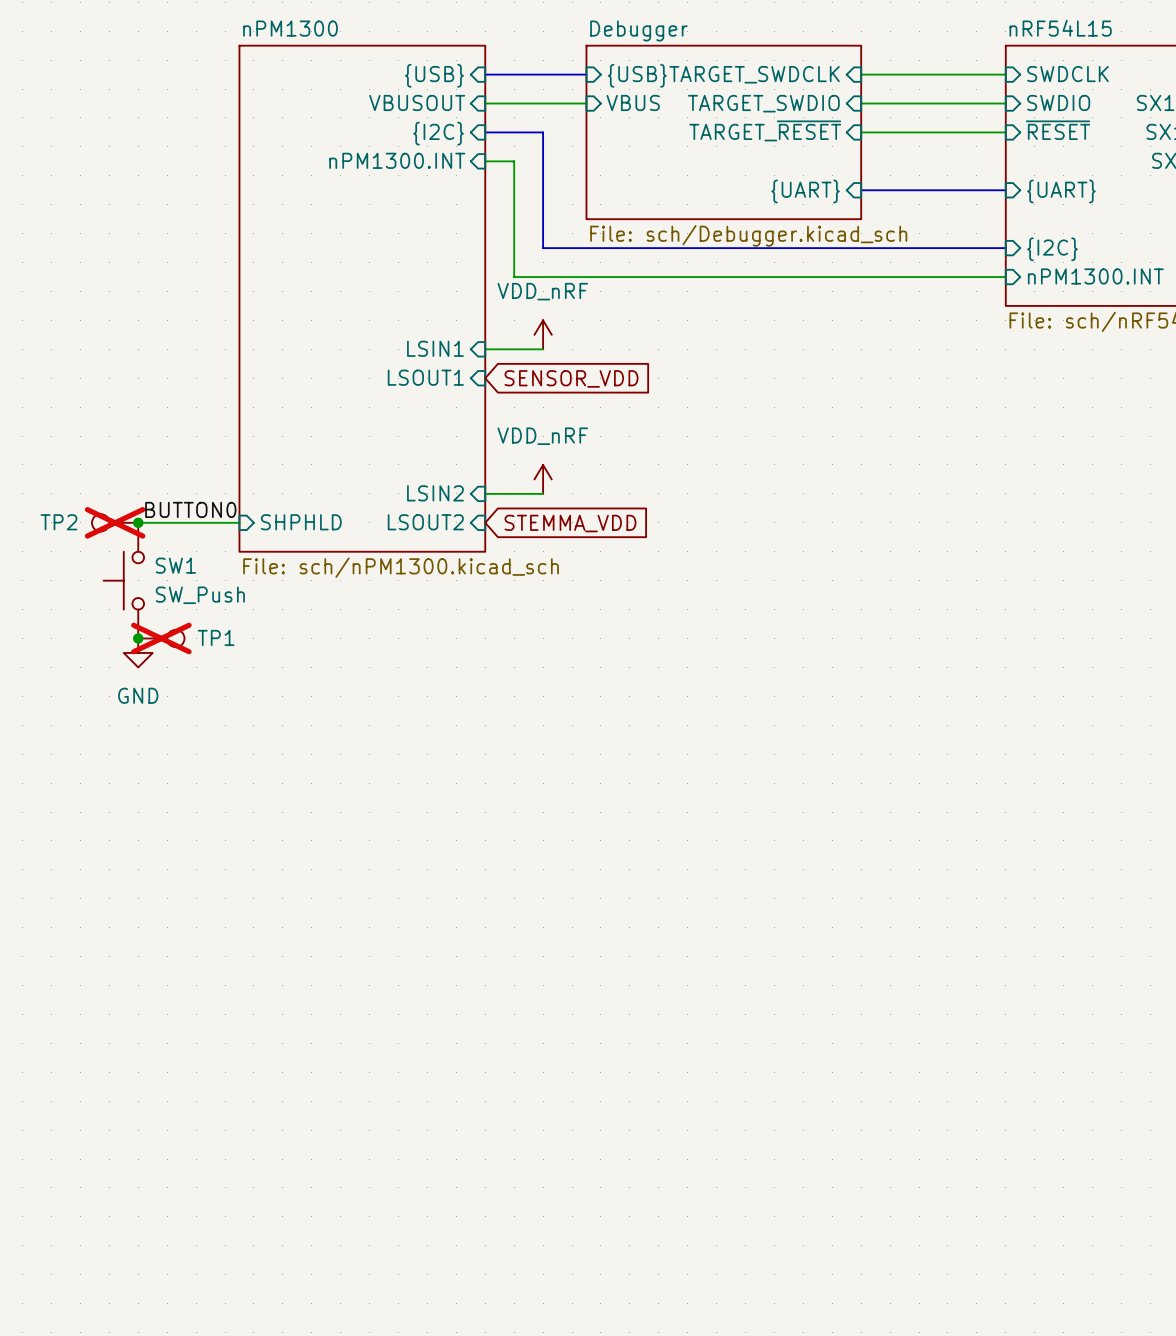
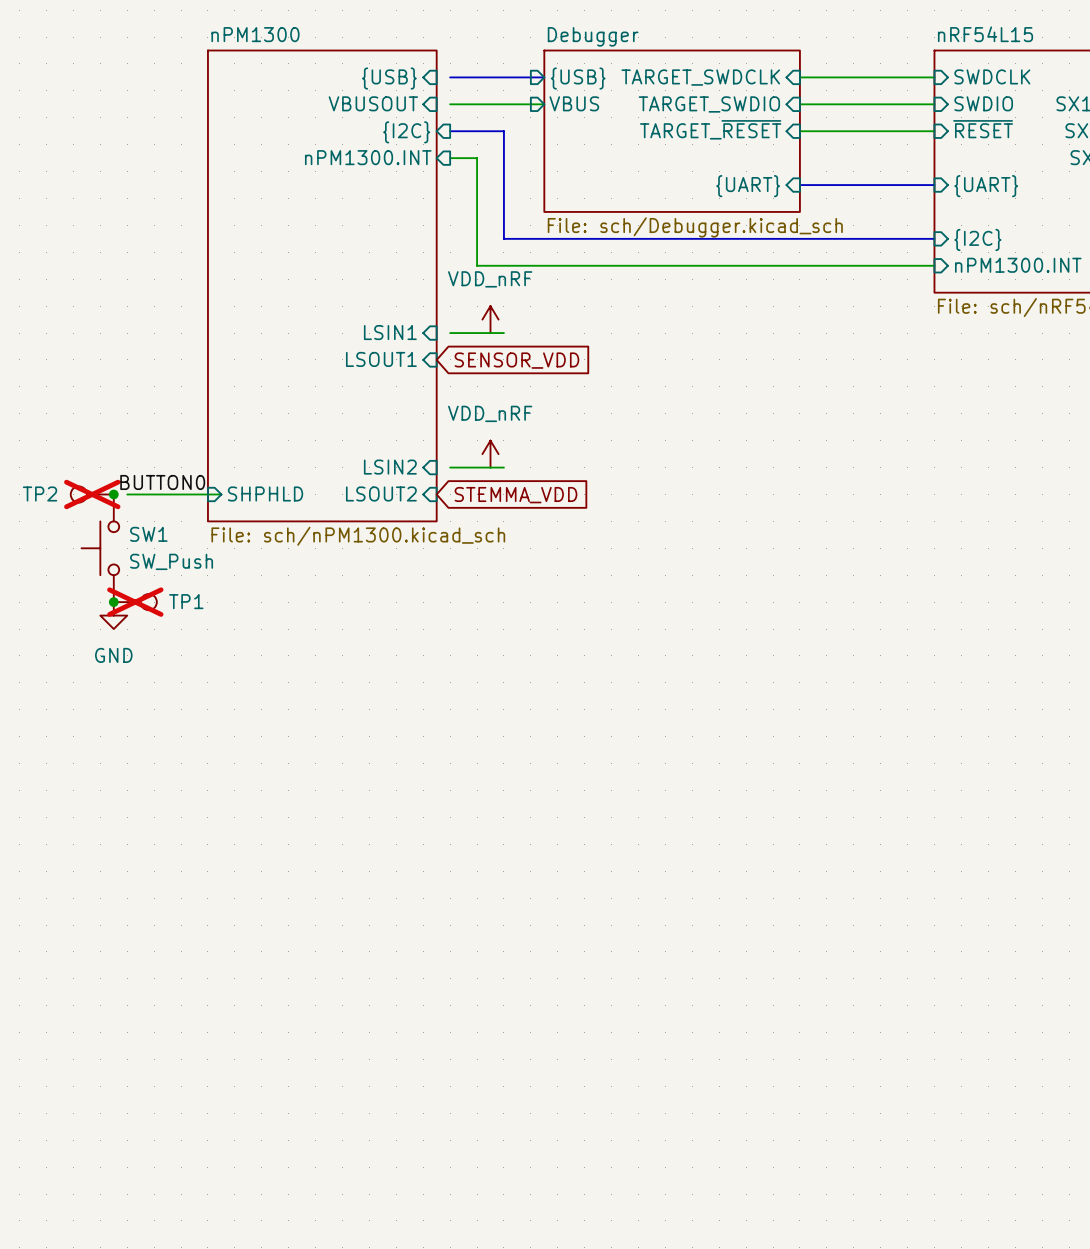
sheet pin position: {USB} (434, 75) -> {USB} (389, 78)
sheet pin position: {USB} (637, 75) -> {USB} (578, 78)
sheet pin position: VBUSOUT (417, 102) -> VBUSOUT (373, 103)
sheet pin position: VBUS (633, 102) -> VBUS (574, 103)
sheet nPM1300 position: (362, 298) -> (322, 285)
power symbol position: VDD_nRF (543, 334) -> VDD_nRF (490, 319)
sheet pin position: LSIN1 (435, 348) -> LSIN1 (390, 332)
sheet pin position: LSOUT1 (425, 377) -> LSOUT1 (381, 359)
global label position: SENSOR_VDD (571, 378) -> SENSOR_VDD (516, 360)
power symbol position: VDD_nRF (543, 479) -> VDD_nRF (490, 454)
sheet pin position: LSIN2 (435, 493) -> LSIN2 (390, 467)
label position: BUTTON0 (190, 509) -> BUTTON0 (162, 482)
TP2 position: (115, 522) -> (92, 494)
junction position: (138, 522) -> (113, 494)
sheet pin position: SHPHLD (301, 522) -> SHPHLD (265, 493)
sheet pin position: LSOUT2 (425, 522) -> LSOUT2 (381, 493)
global label position: STEMMA_VDD (570, 523) -> STEMMA_VDD (515, 495)
SW1 position: (123, 580) -> (100, 548)
junction position: (138, 638) -> (113, 602)
TP1 position: (161, 638) -> (135, 602)
power symbol position: GND (138, 652) -> GND (113, 615)

